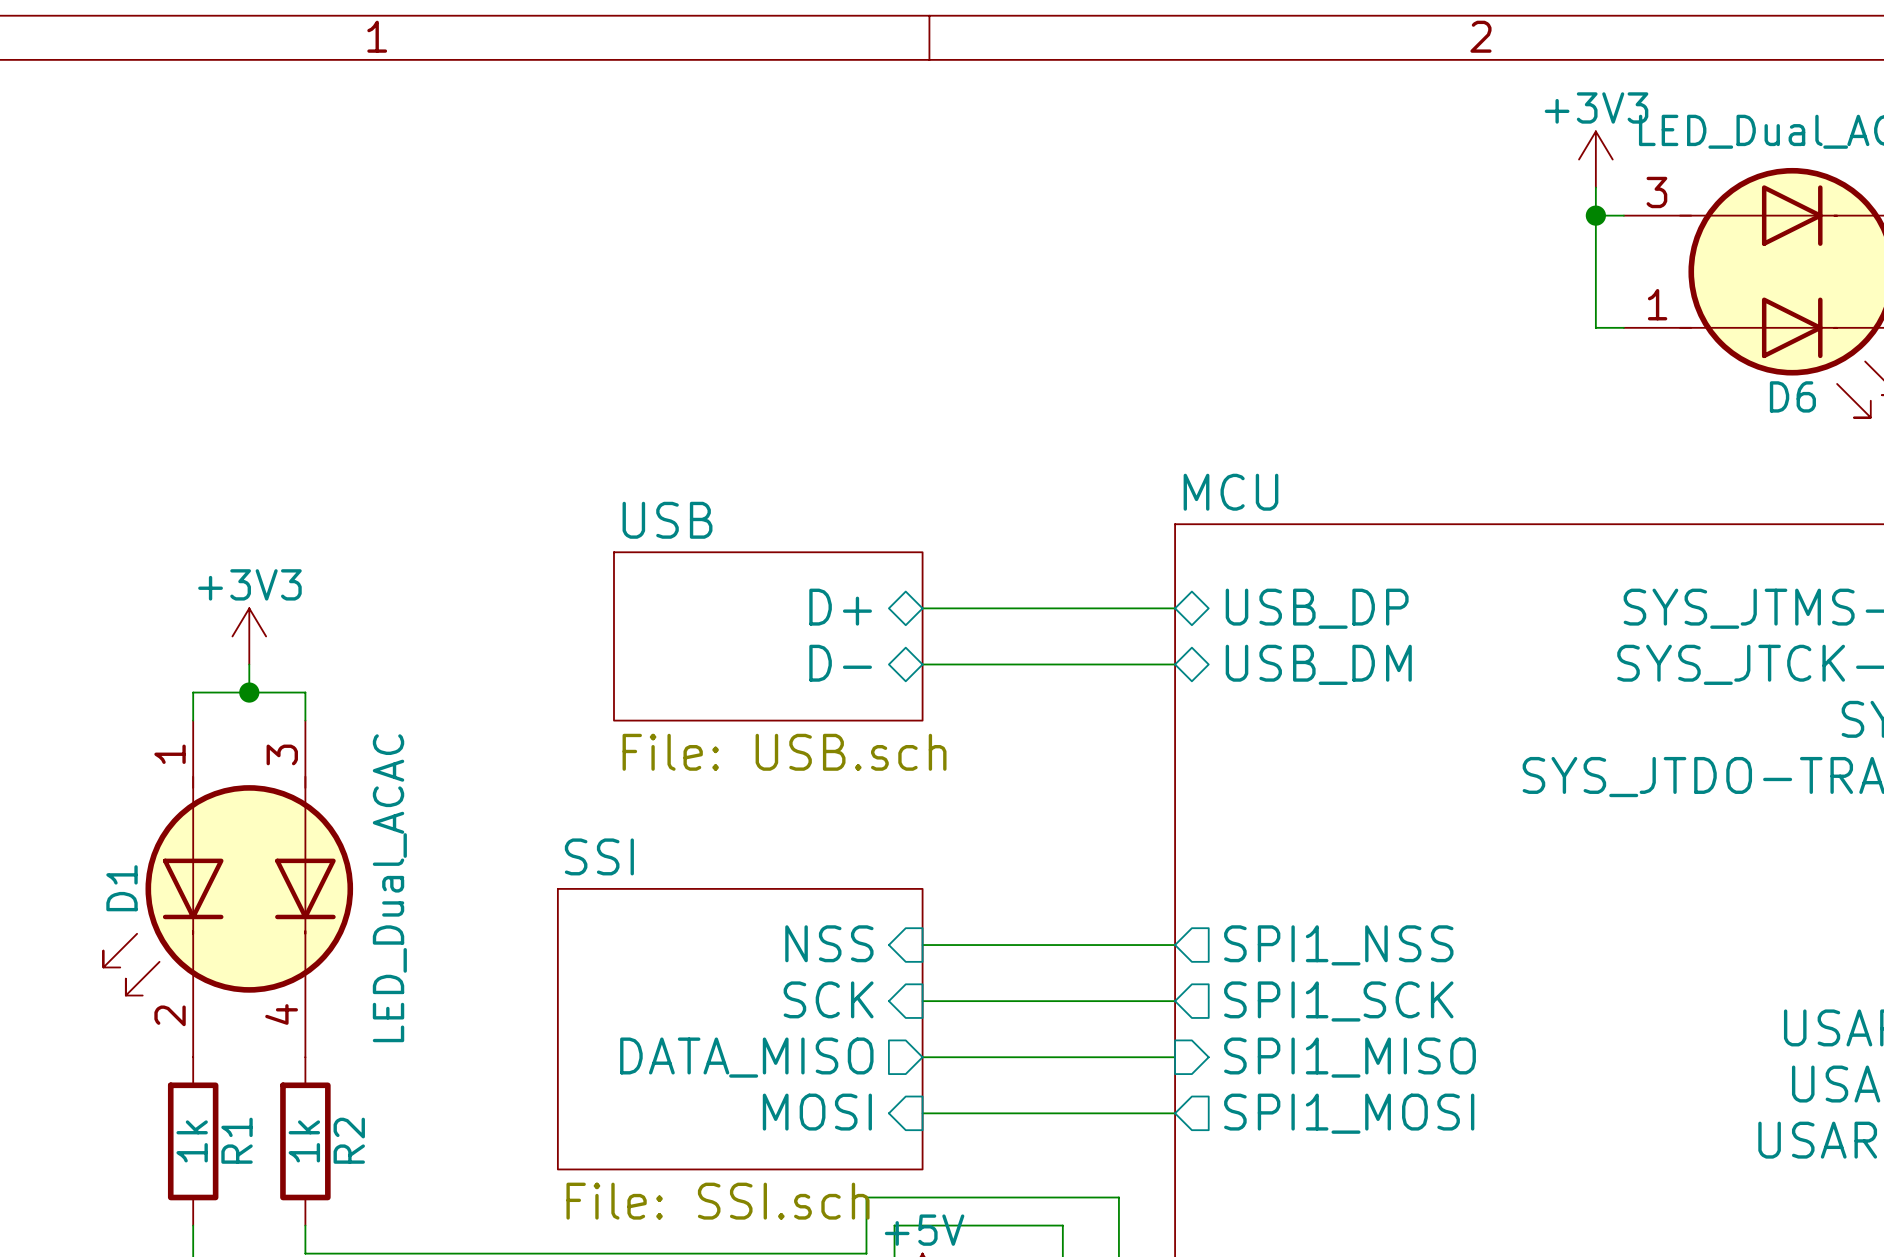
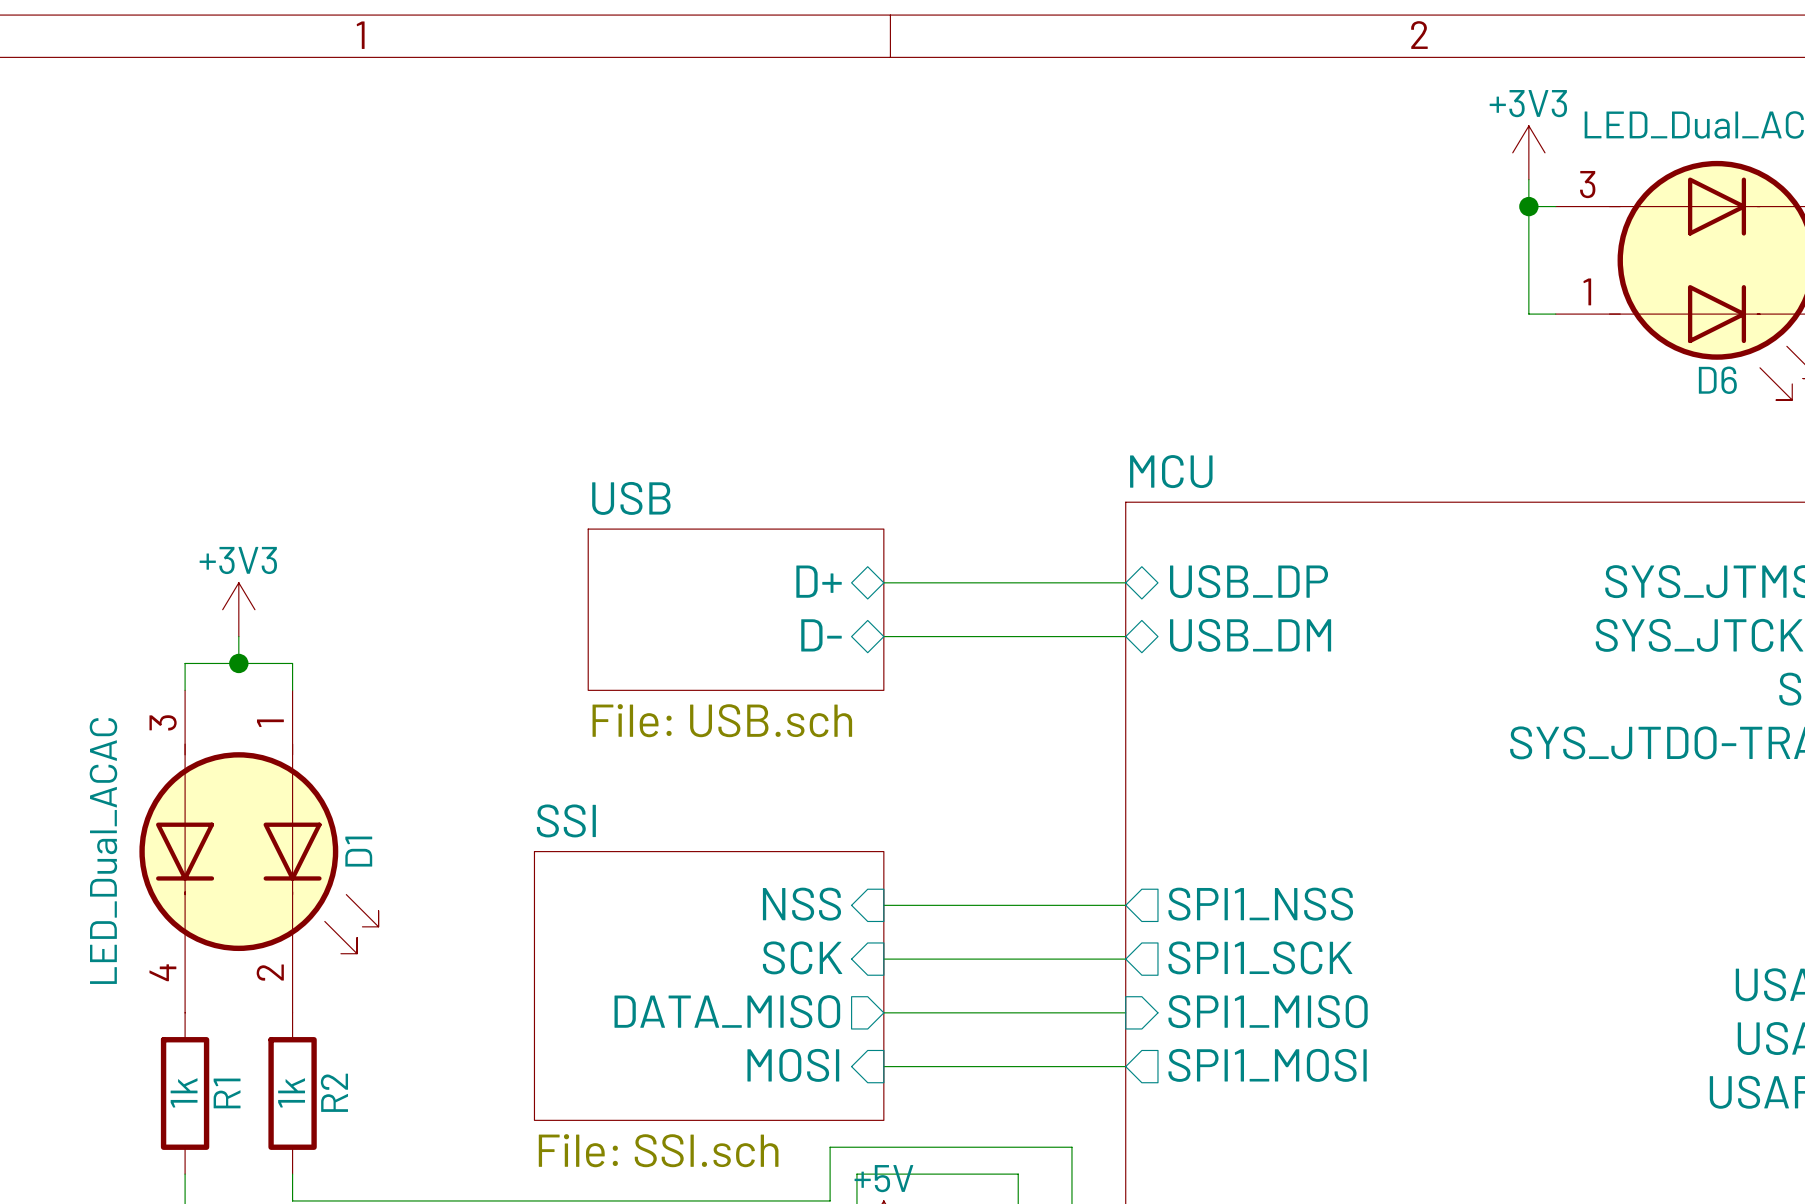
D1 flip: as is (228, 886) -> left-right (258, 848)

